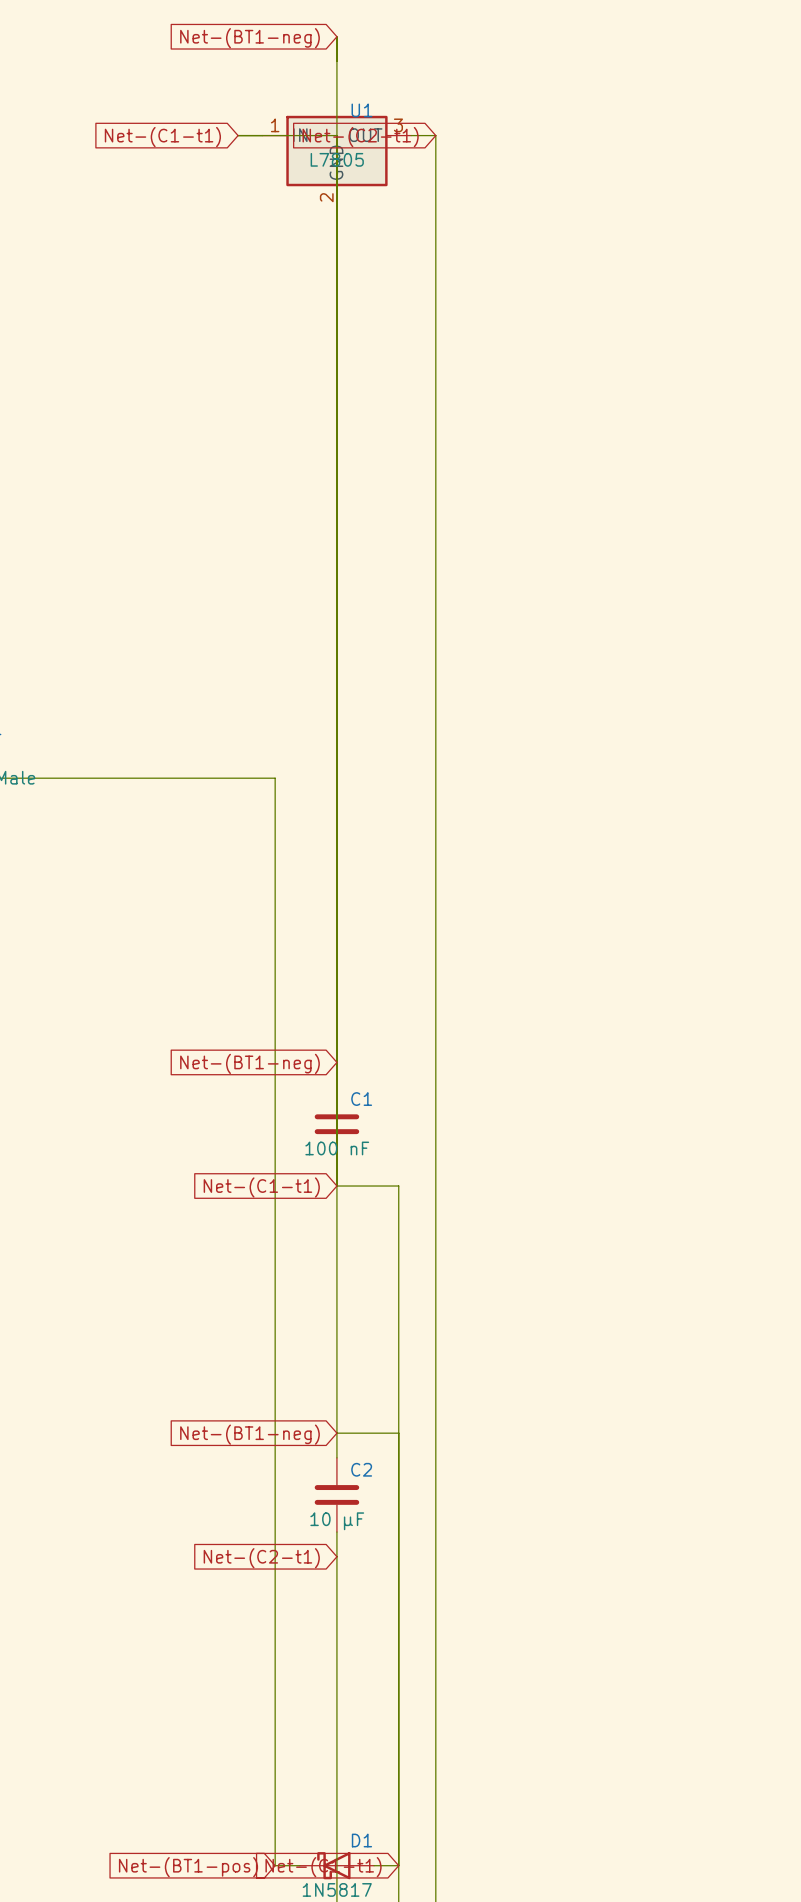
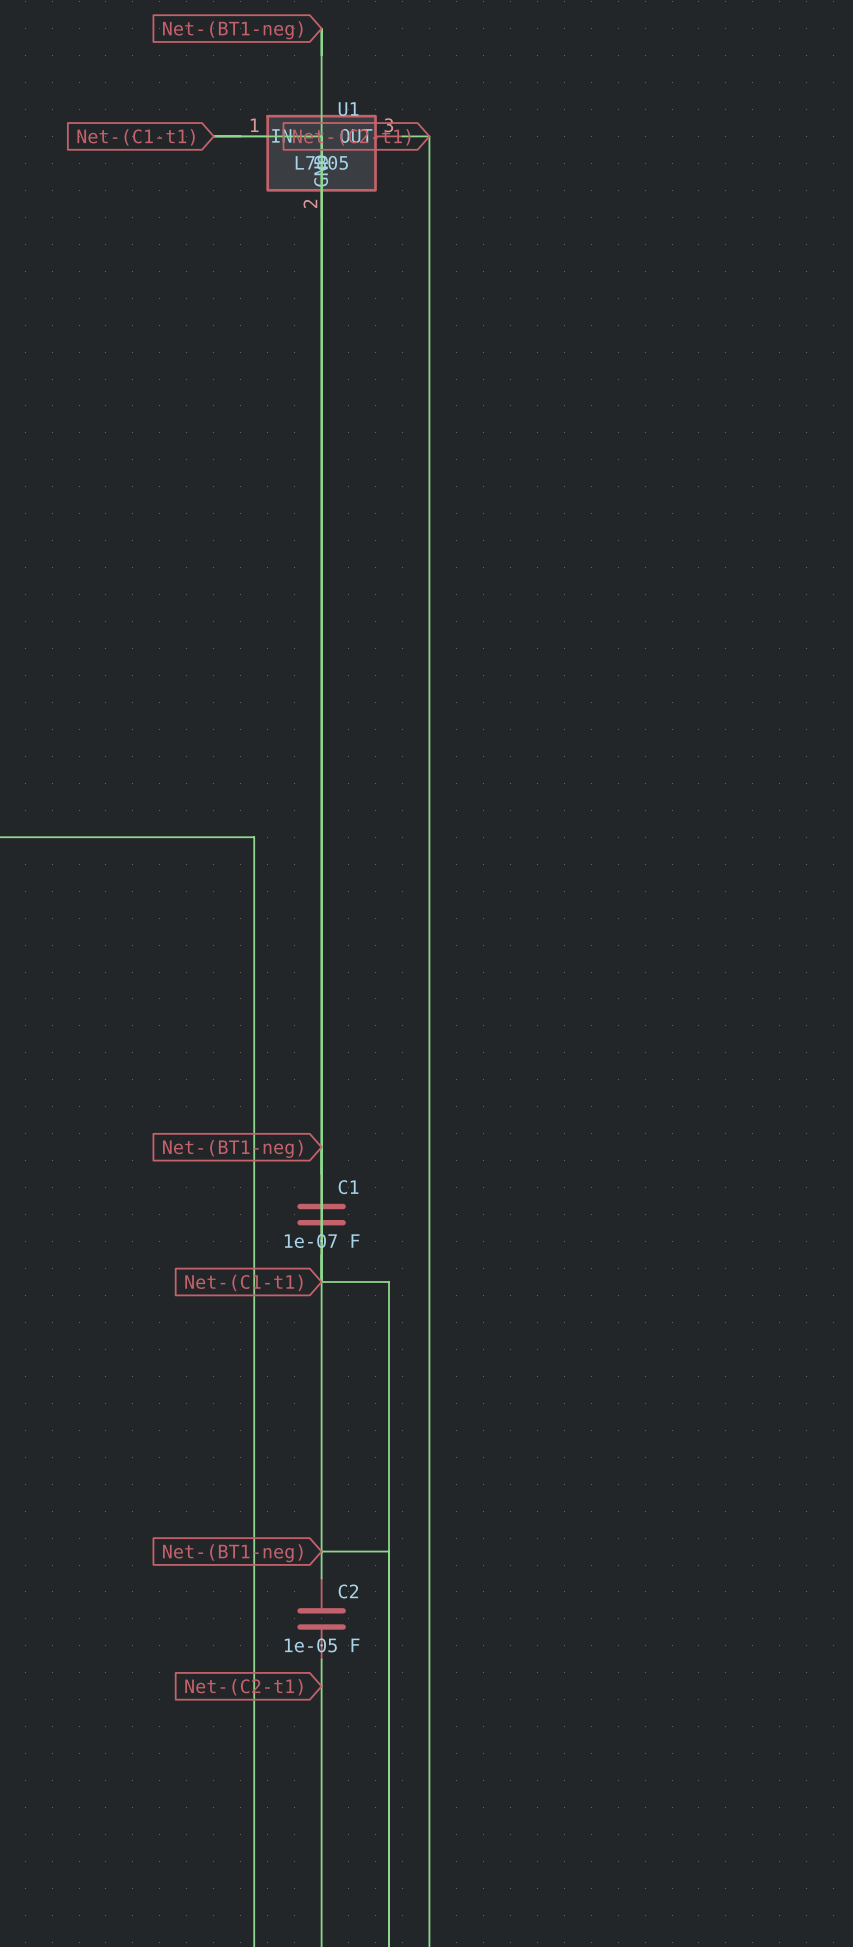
C1 value: 100 nF (337, 1148) -> 1e-07 F (322, 1241)
C2 value: 10 µF (337, 1521) -> 1e-05 F (322, 1645)

